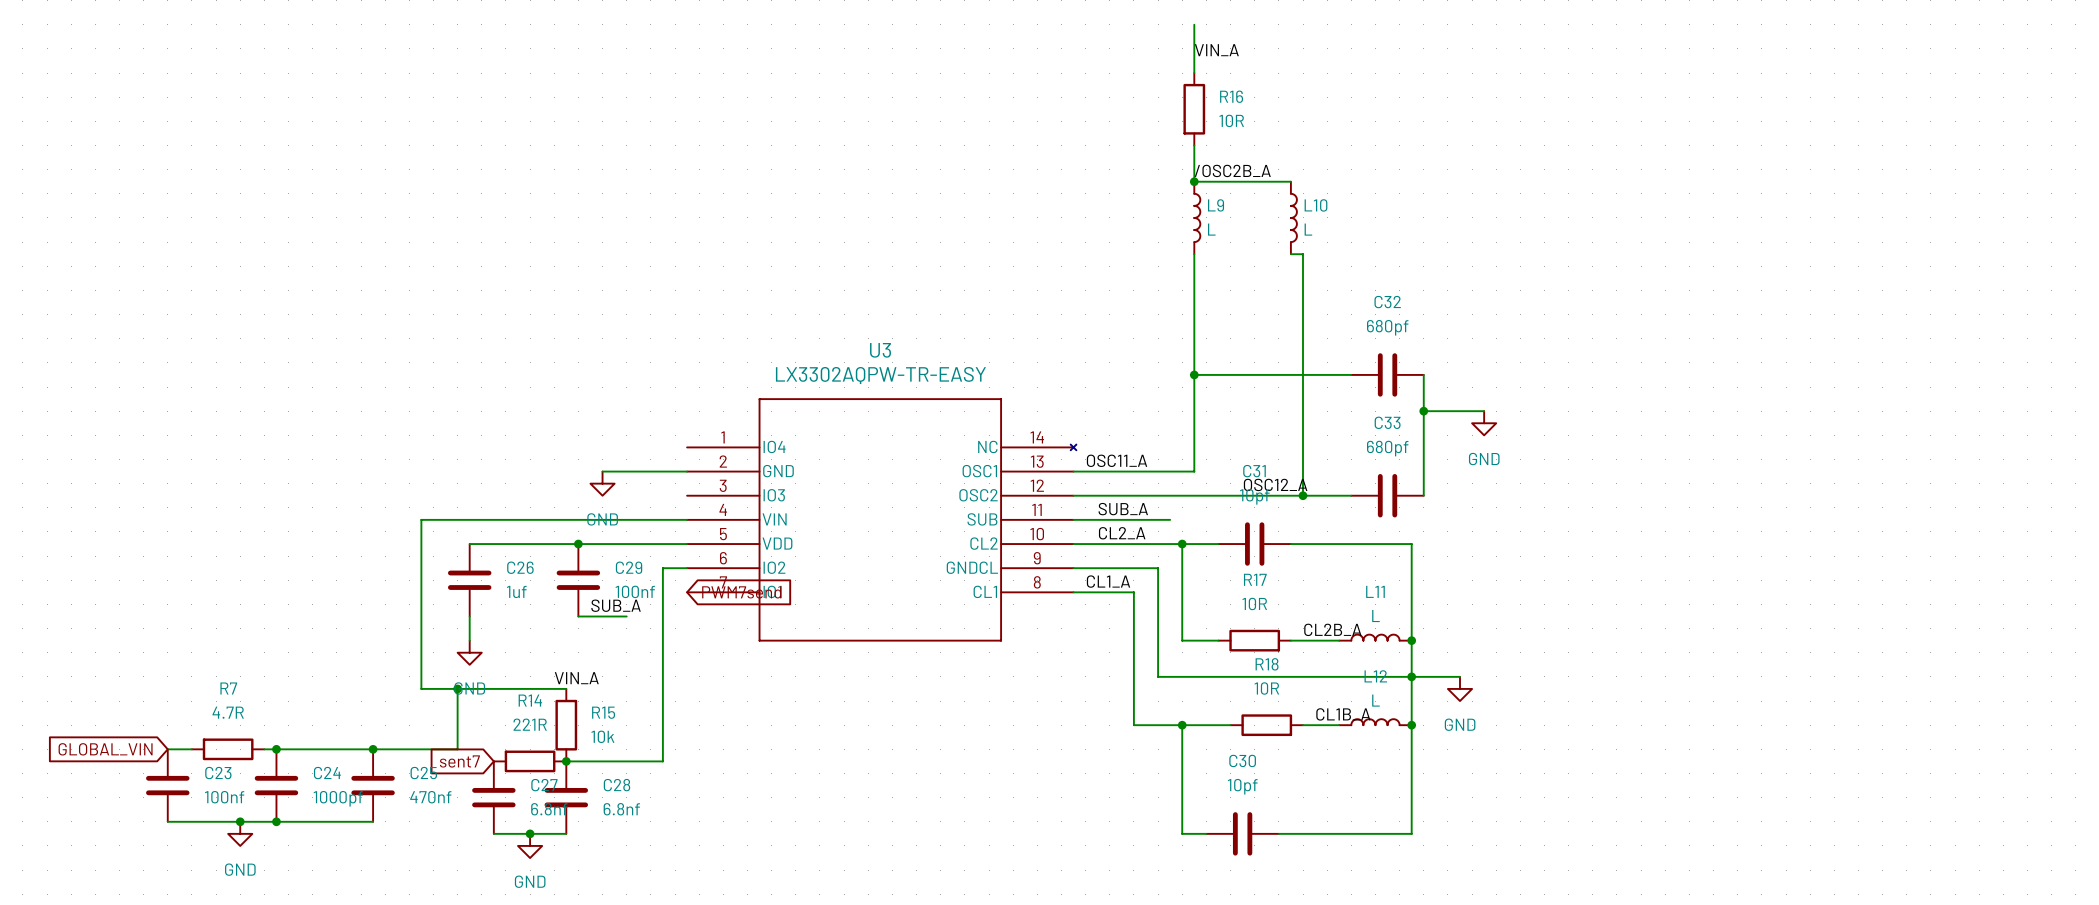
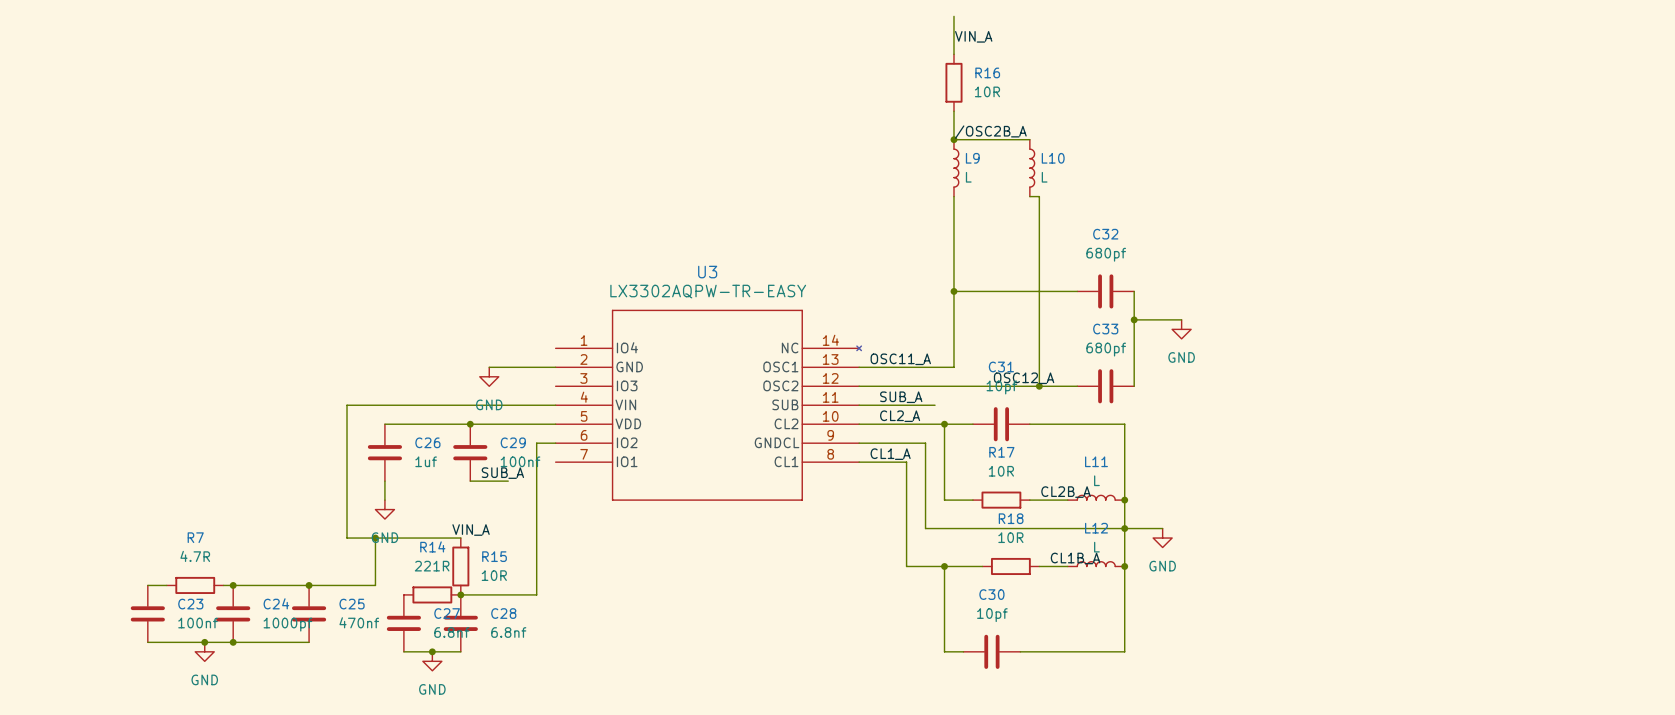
global label: PWM7send (741, 592) -> none
R15 value: 10k (602, 736) -> 10R (494, 575)
global label: GLOBAL_VIN (105, 749) -> none
global label: sent7 (459, 761) -> none

